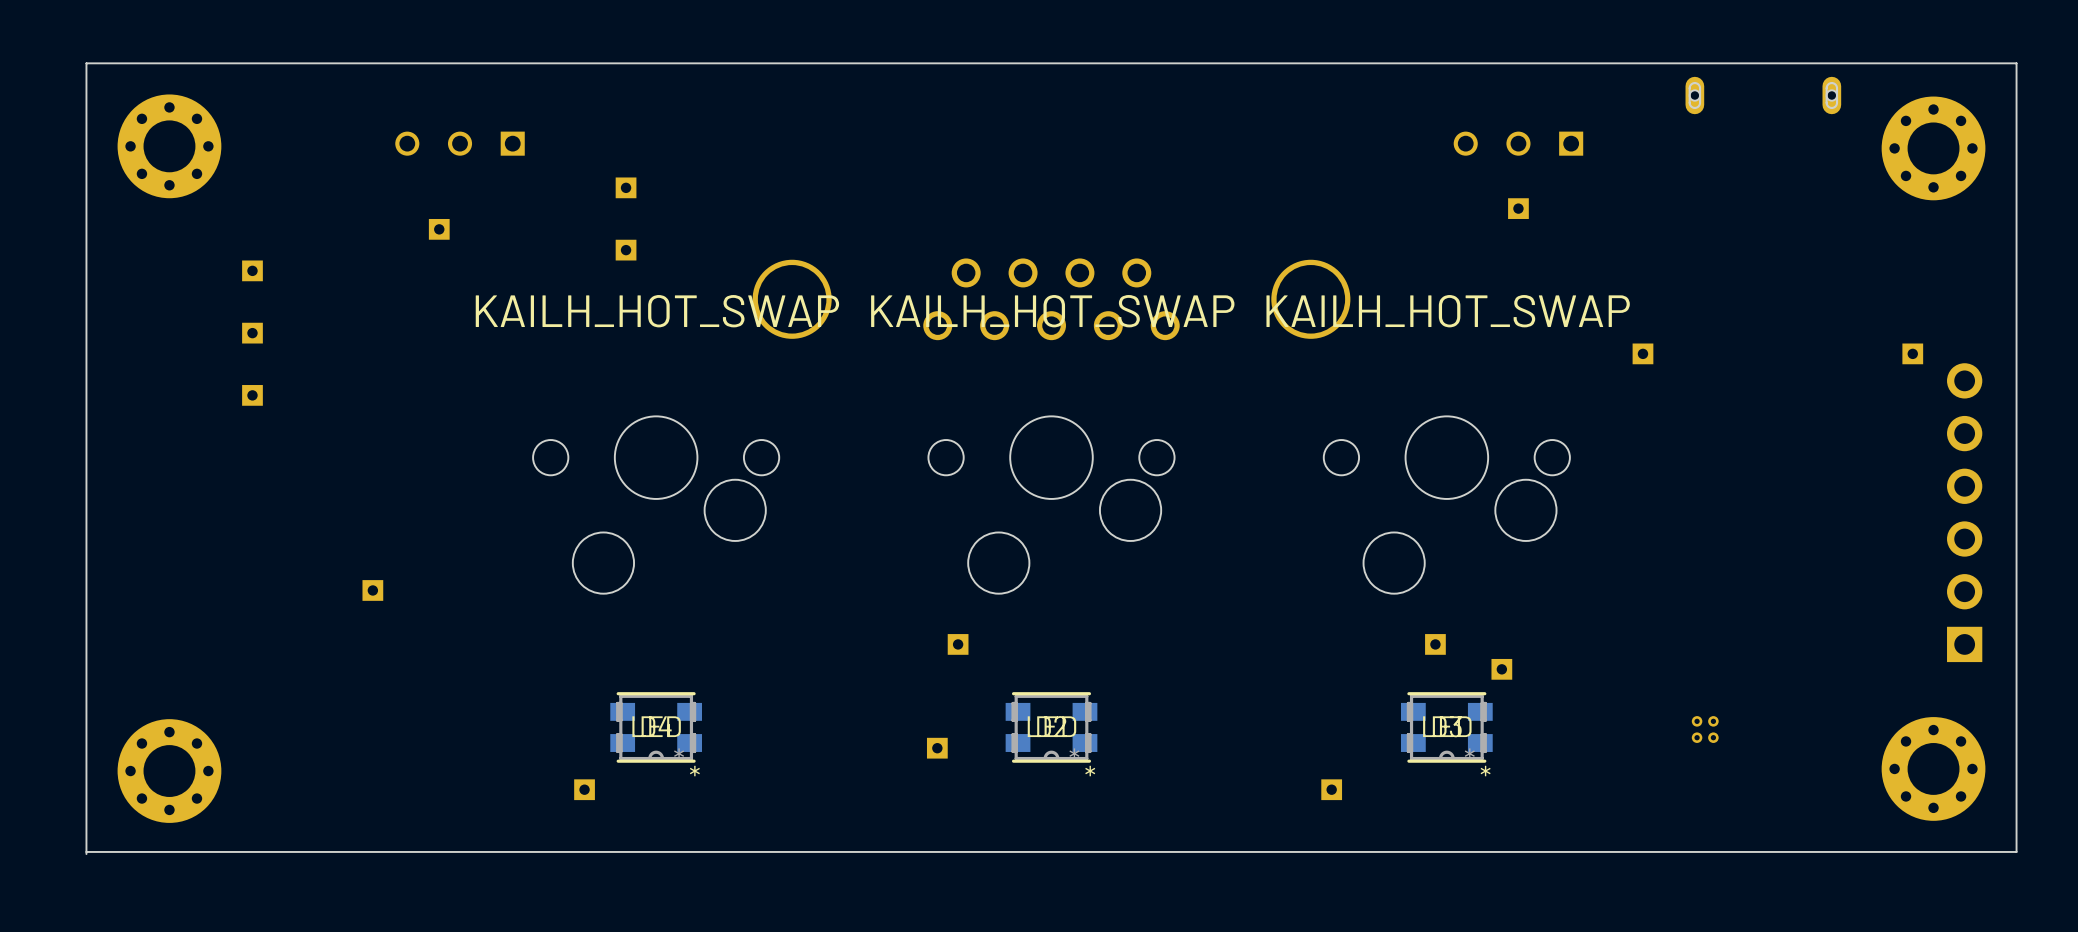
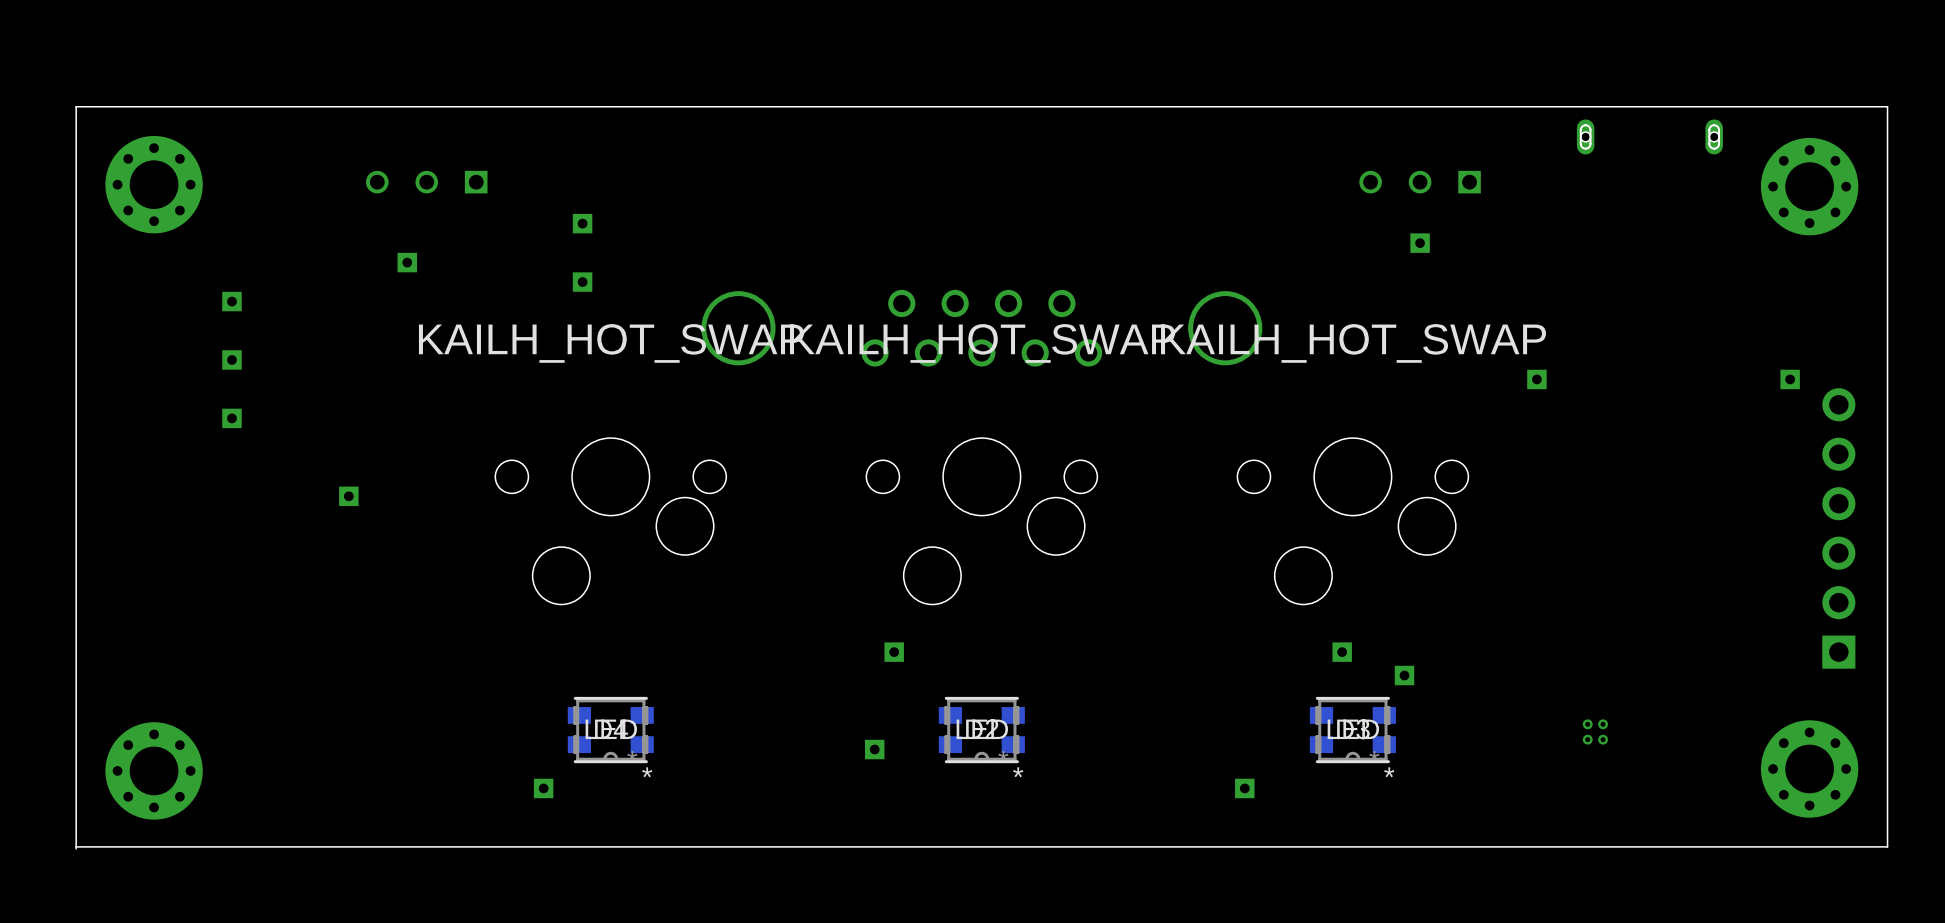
part position: (372, 590) -> (348, 496)

